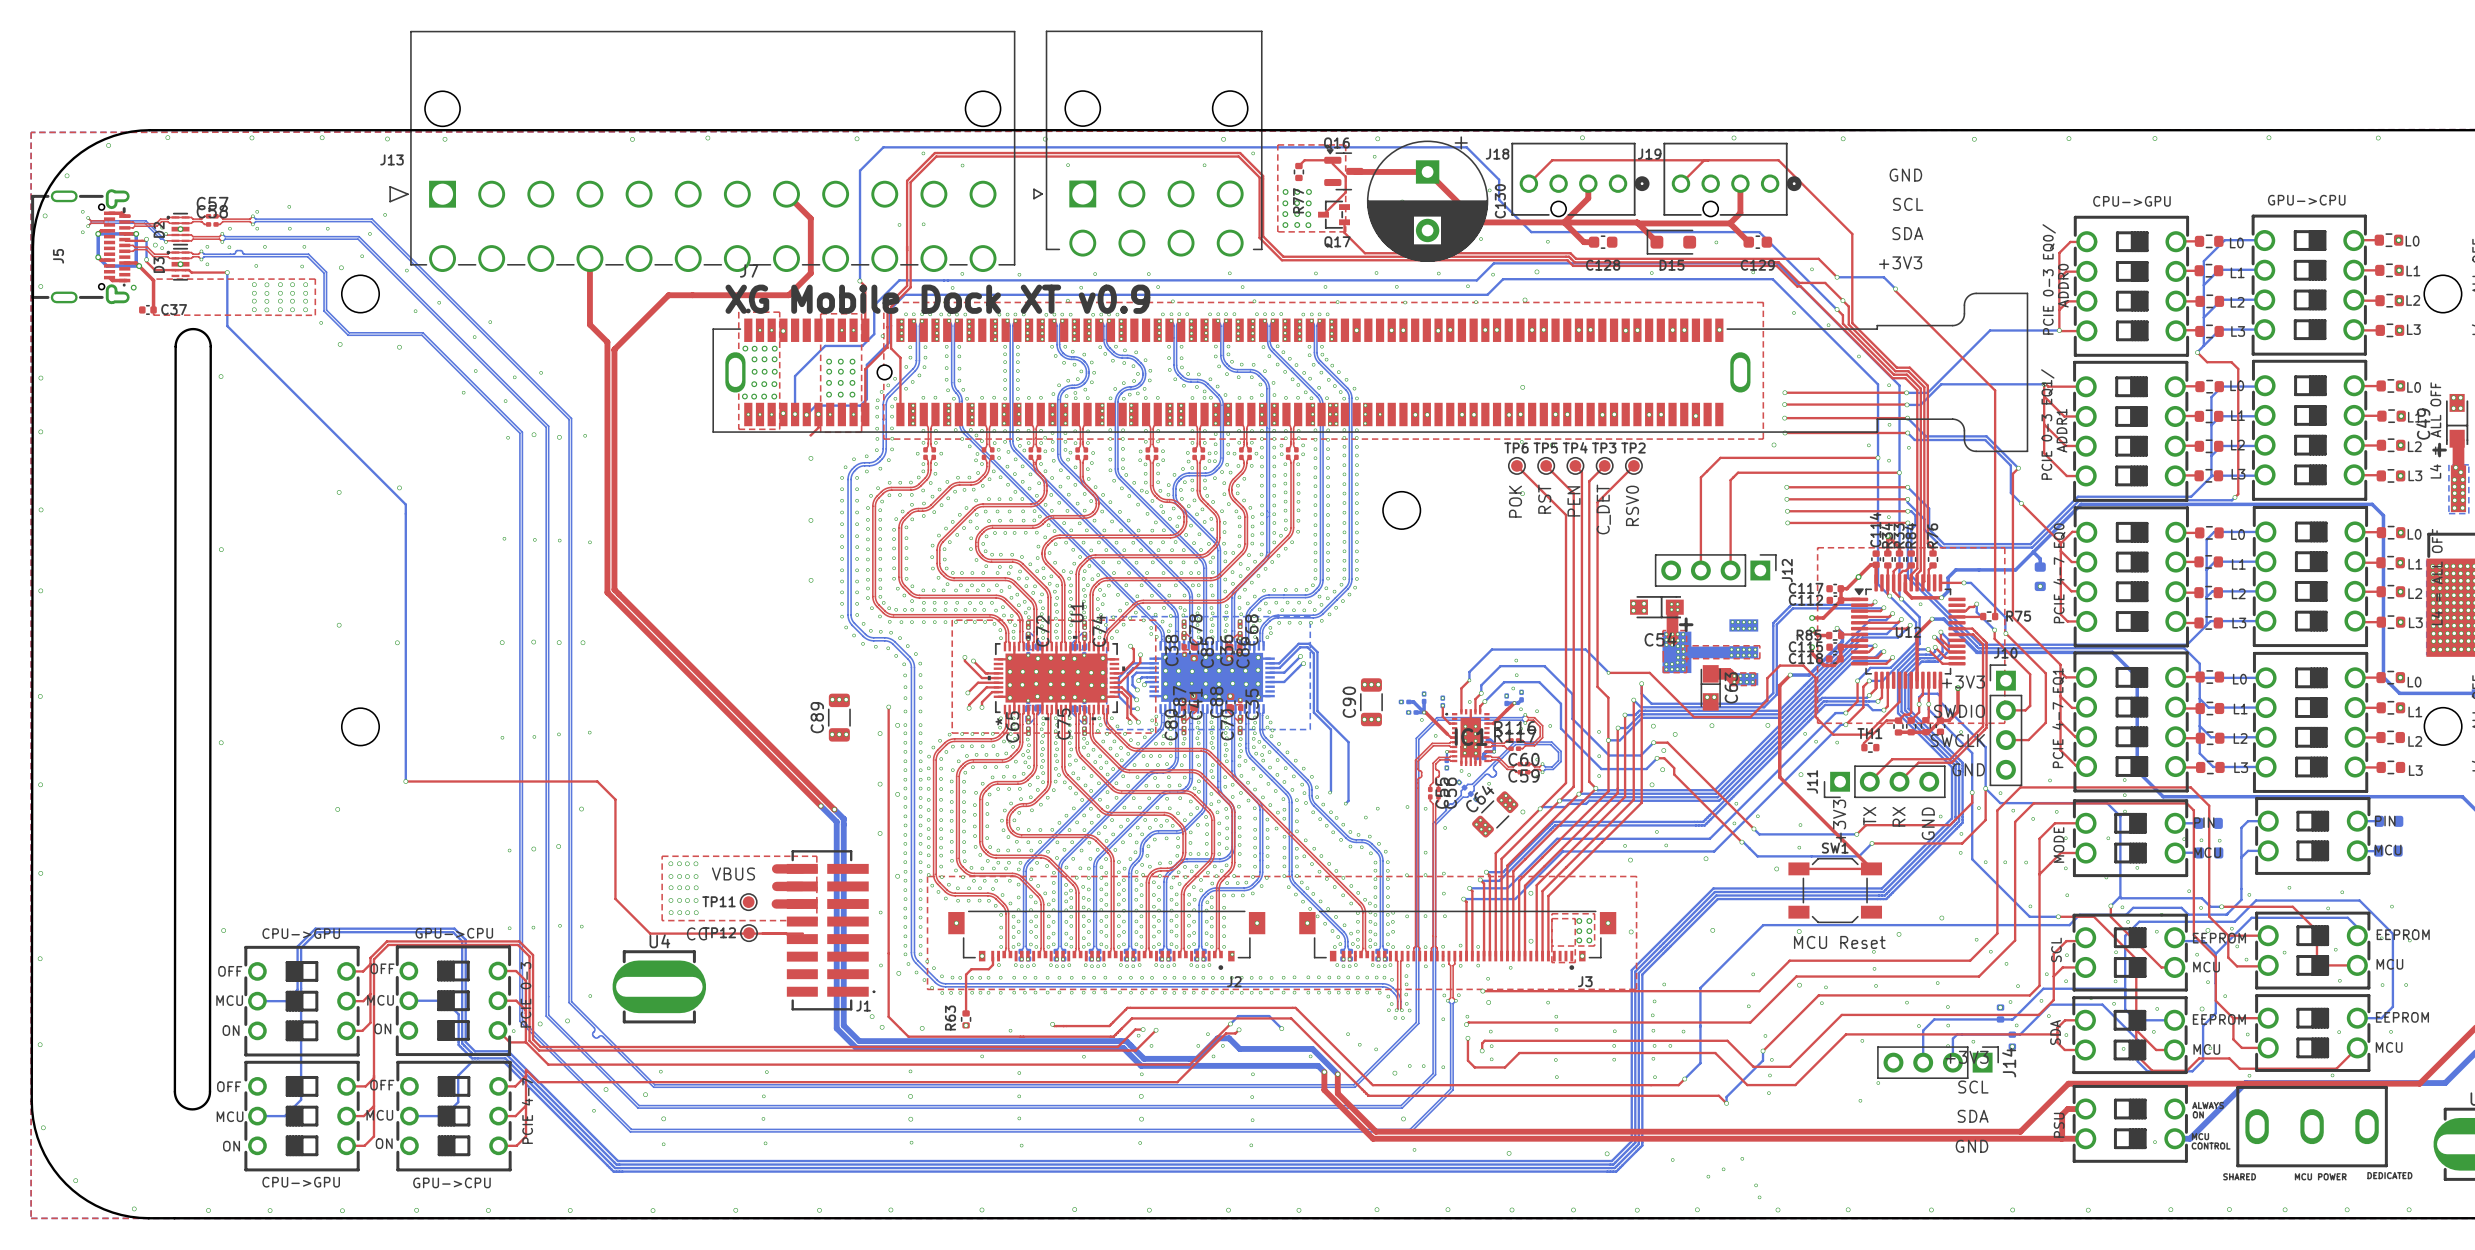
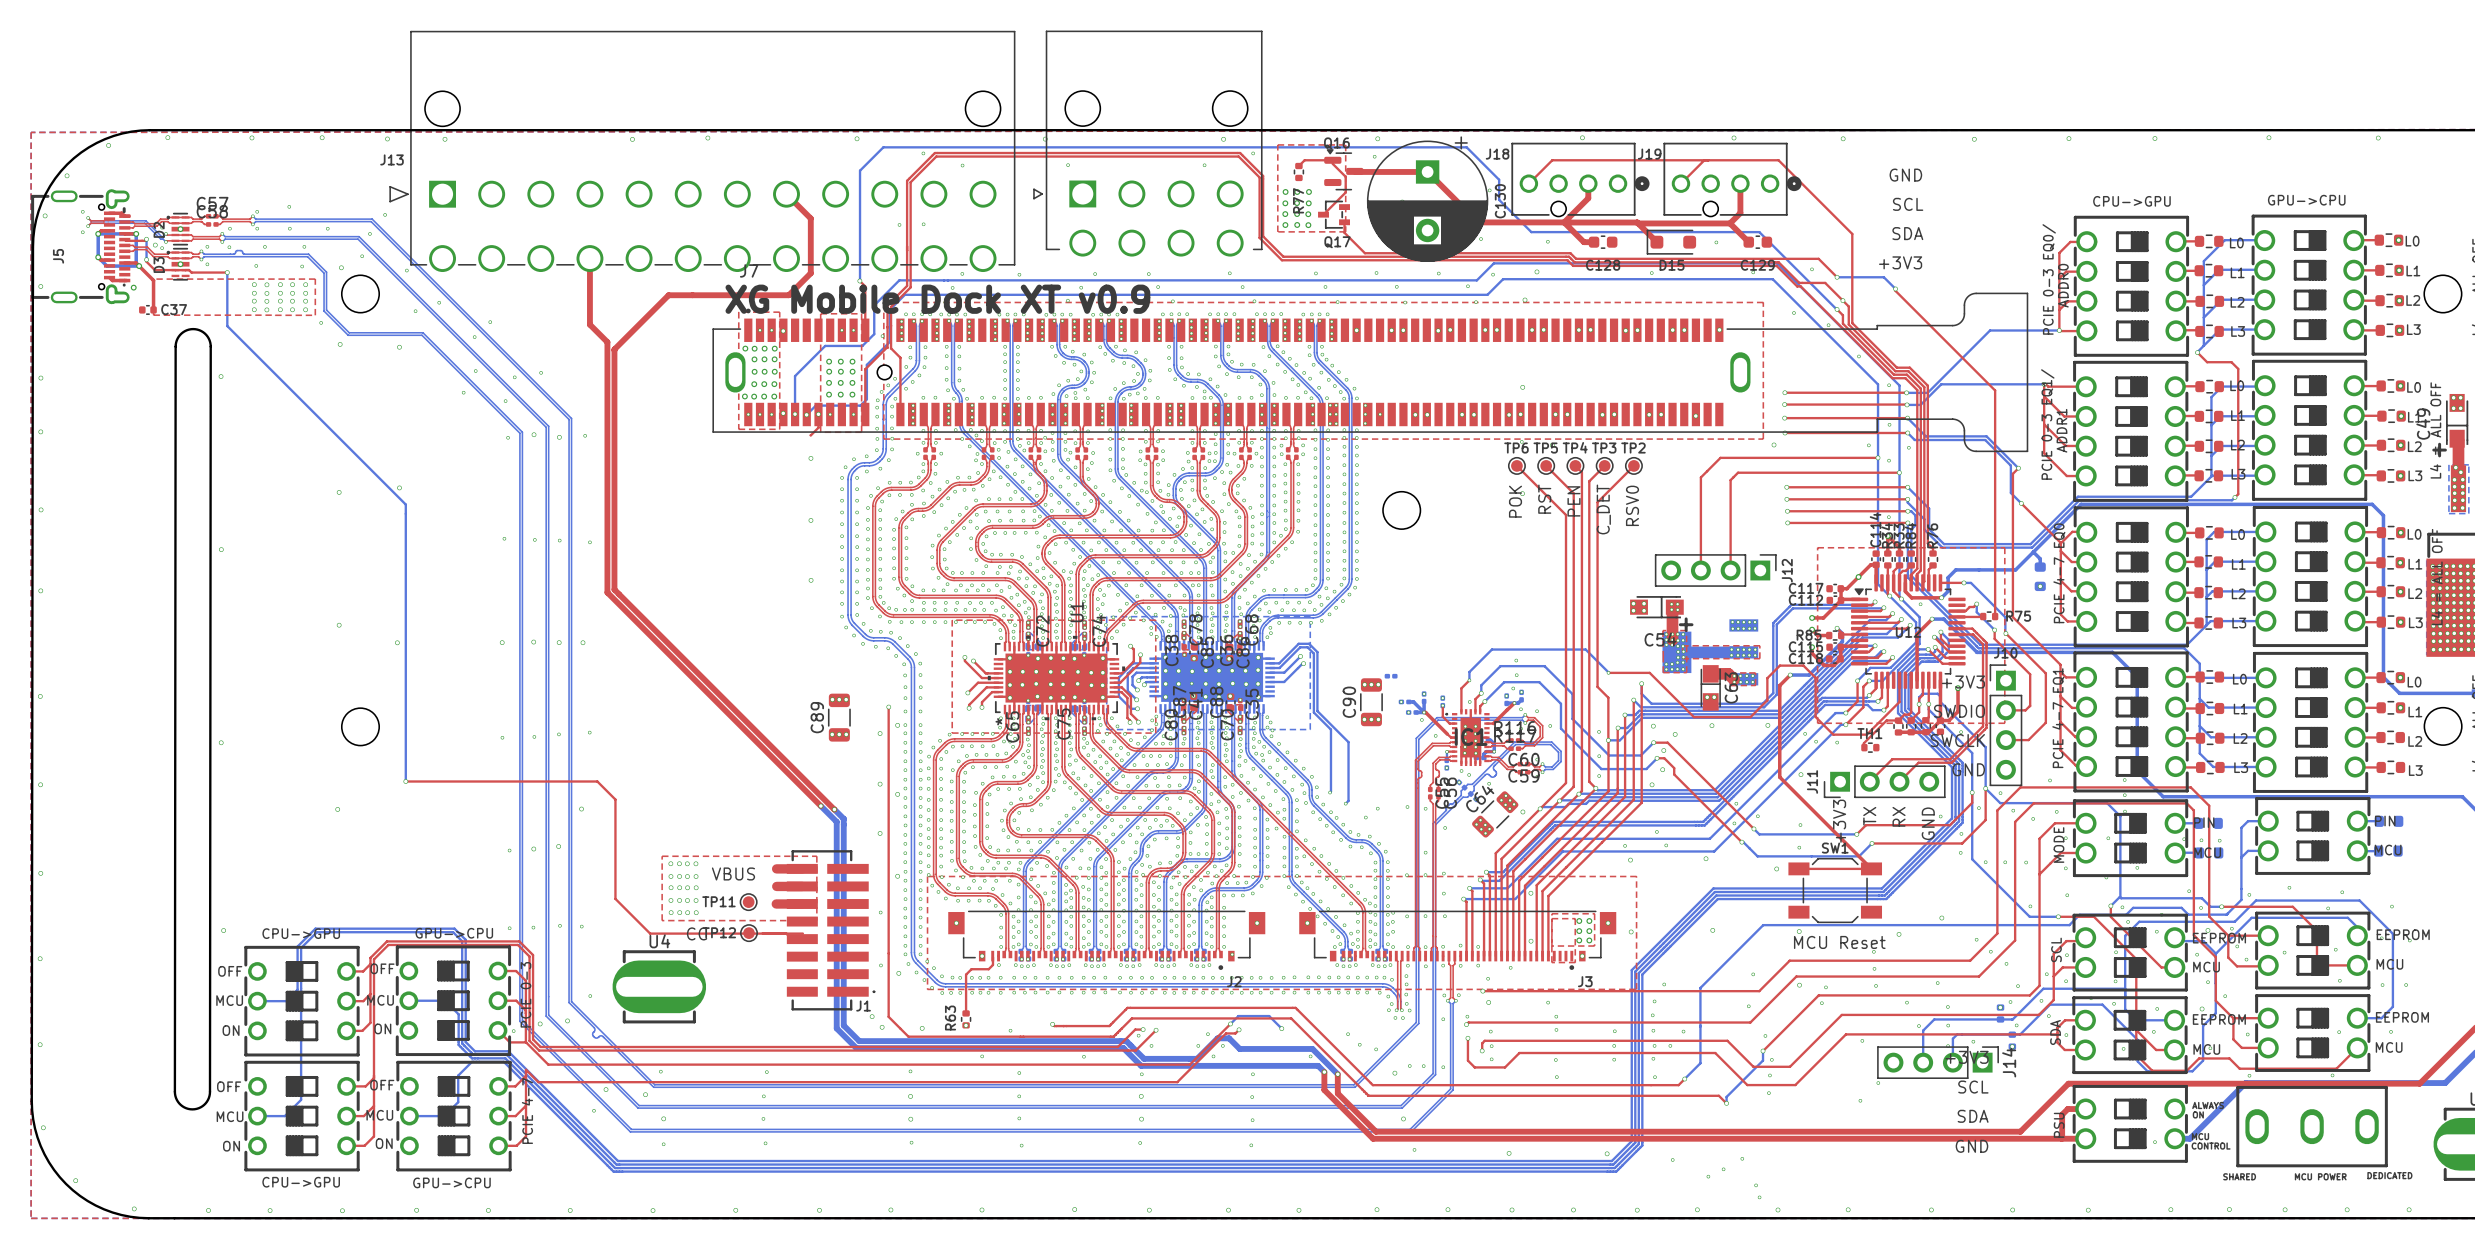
part: none -> (1391, 676)

